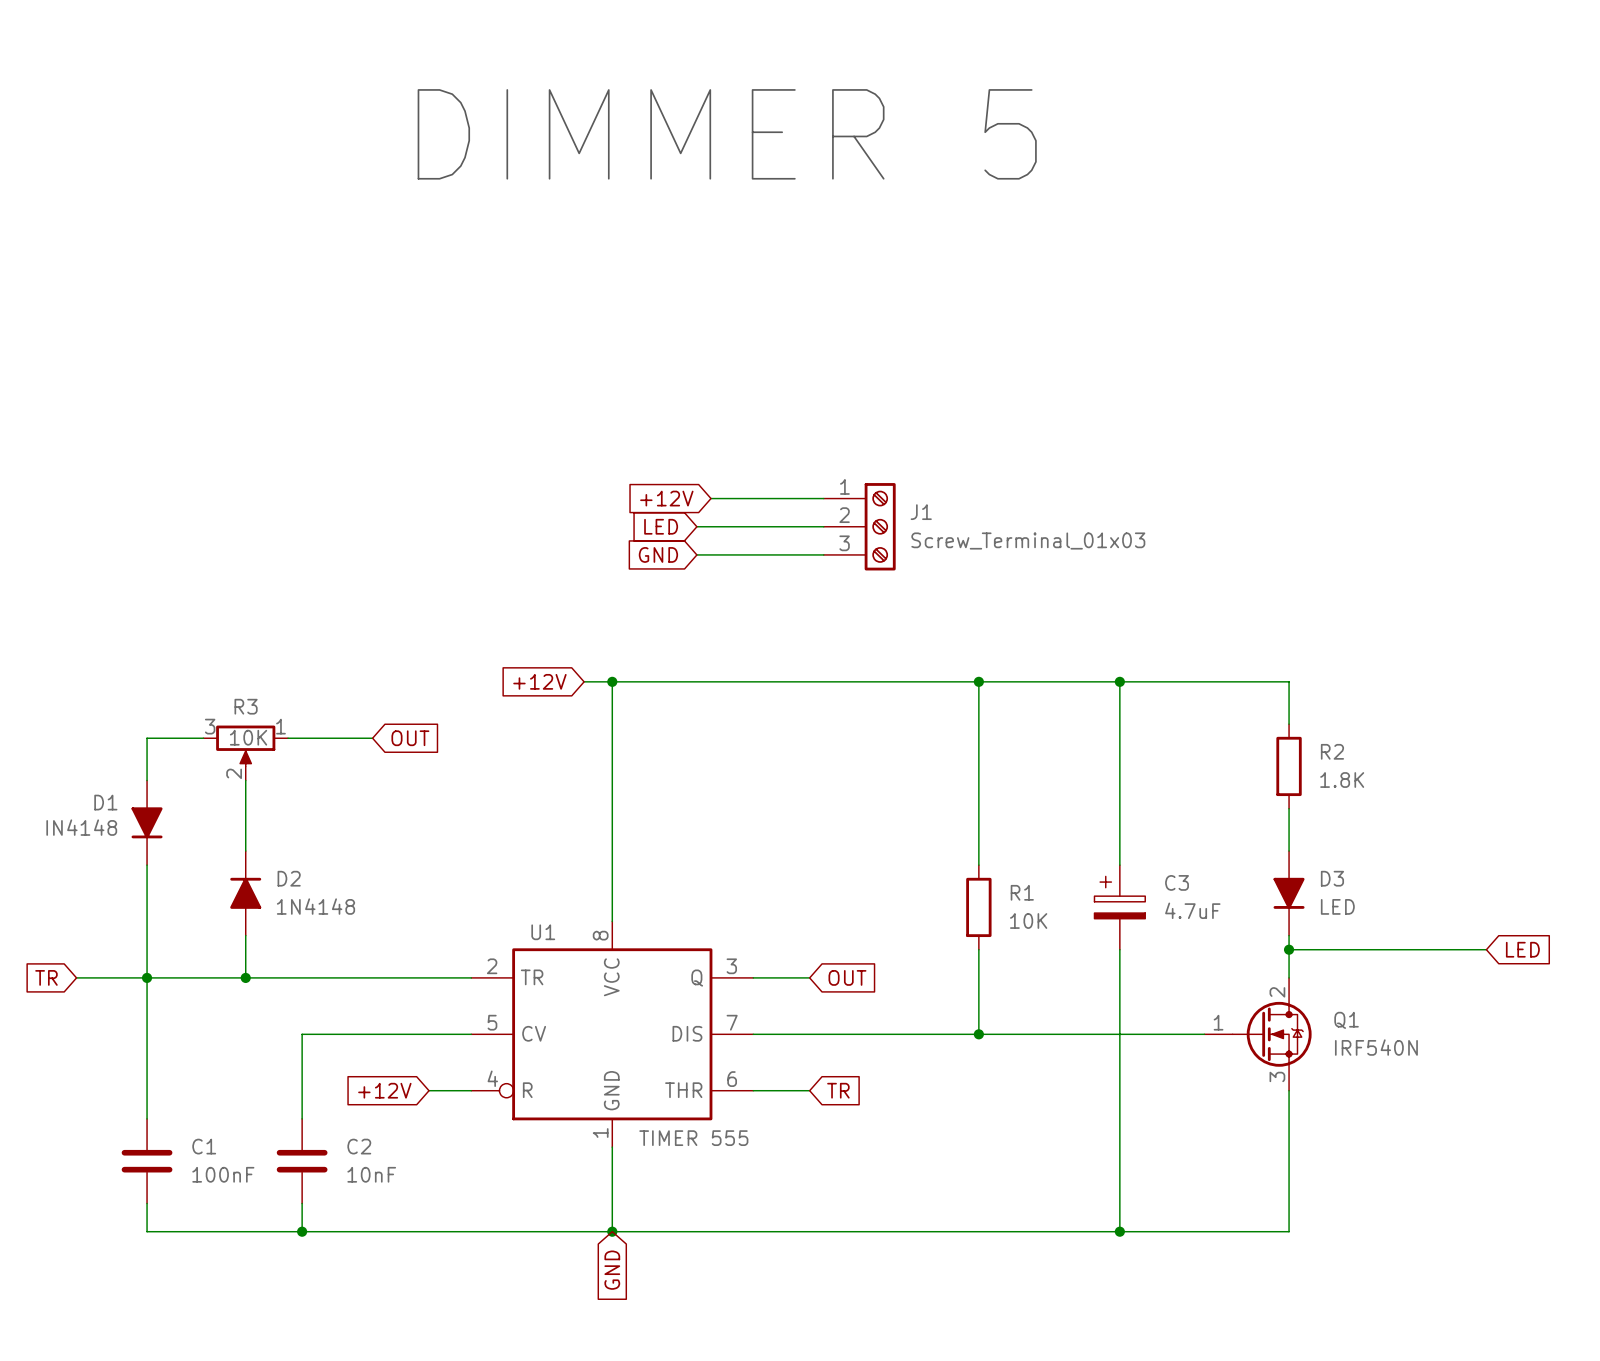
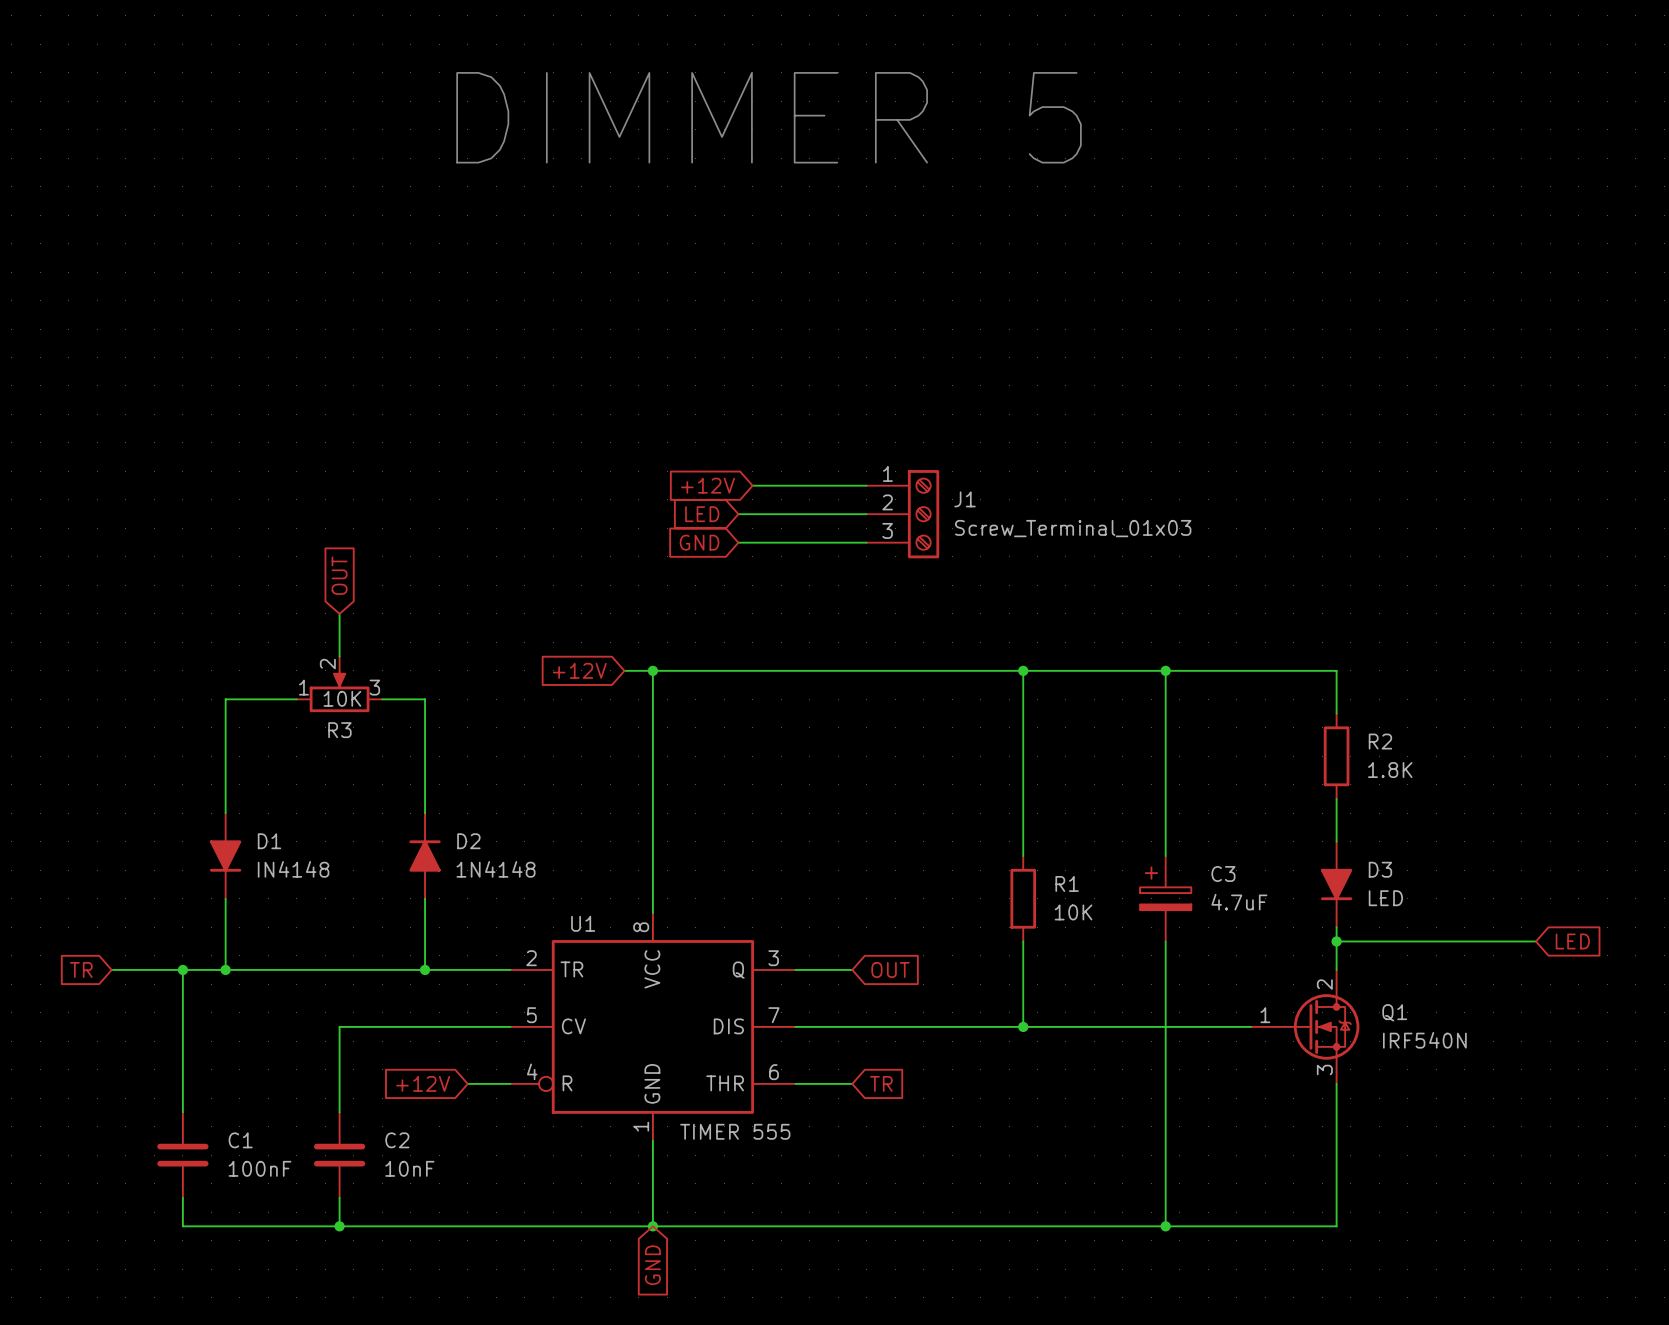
wire: none -> (339, 613) (339, 656)
wire: none -> (296, 699) (225, 699) (225, 813)
wire: none -> (382, 699) (425, 699) (425, 813)
wire: (203, 738) (147, 738) (147, 780) -> none
wire: (288, 738) (372, 738) -> none
global label rotation: 0° (410, 738) -> 90° counterclockwise (339, 575)
global label position: OUT (410, 738) -> OUT (339, 575)
R3 rotation: 0° (245, 746) -> 180° (339, 691)
R3 position: (245, 753) -> (339, 684)
wire: (245, 780) (245, 851) -> (225, 898) (225, 969)
D1 name position: D1 (105, 802) -> D1 (269, 841)
D1 position: (147, 822) -> (225, 856)
D1 value position: IN4148 (81, 827) -> IN4148 (293, 869)
wire: (147, 865) (147, 977) -> none
D2 position: (245, 893) -> (425, 856)
wire: none -> (425, 898) (425, 969)
wire: (245, 935) (245, 977) -> none
junction position: (245, 977) -> (225, 969)
junction: none -> (425, 969)

